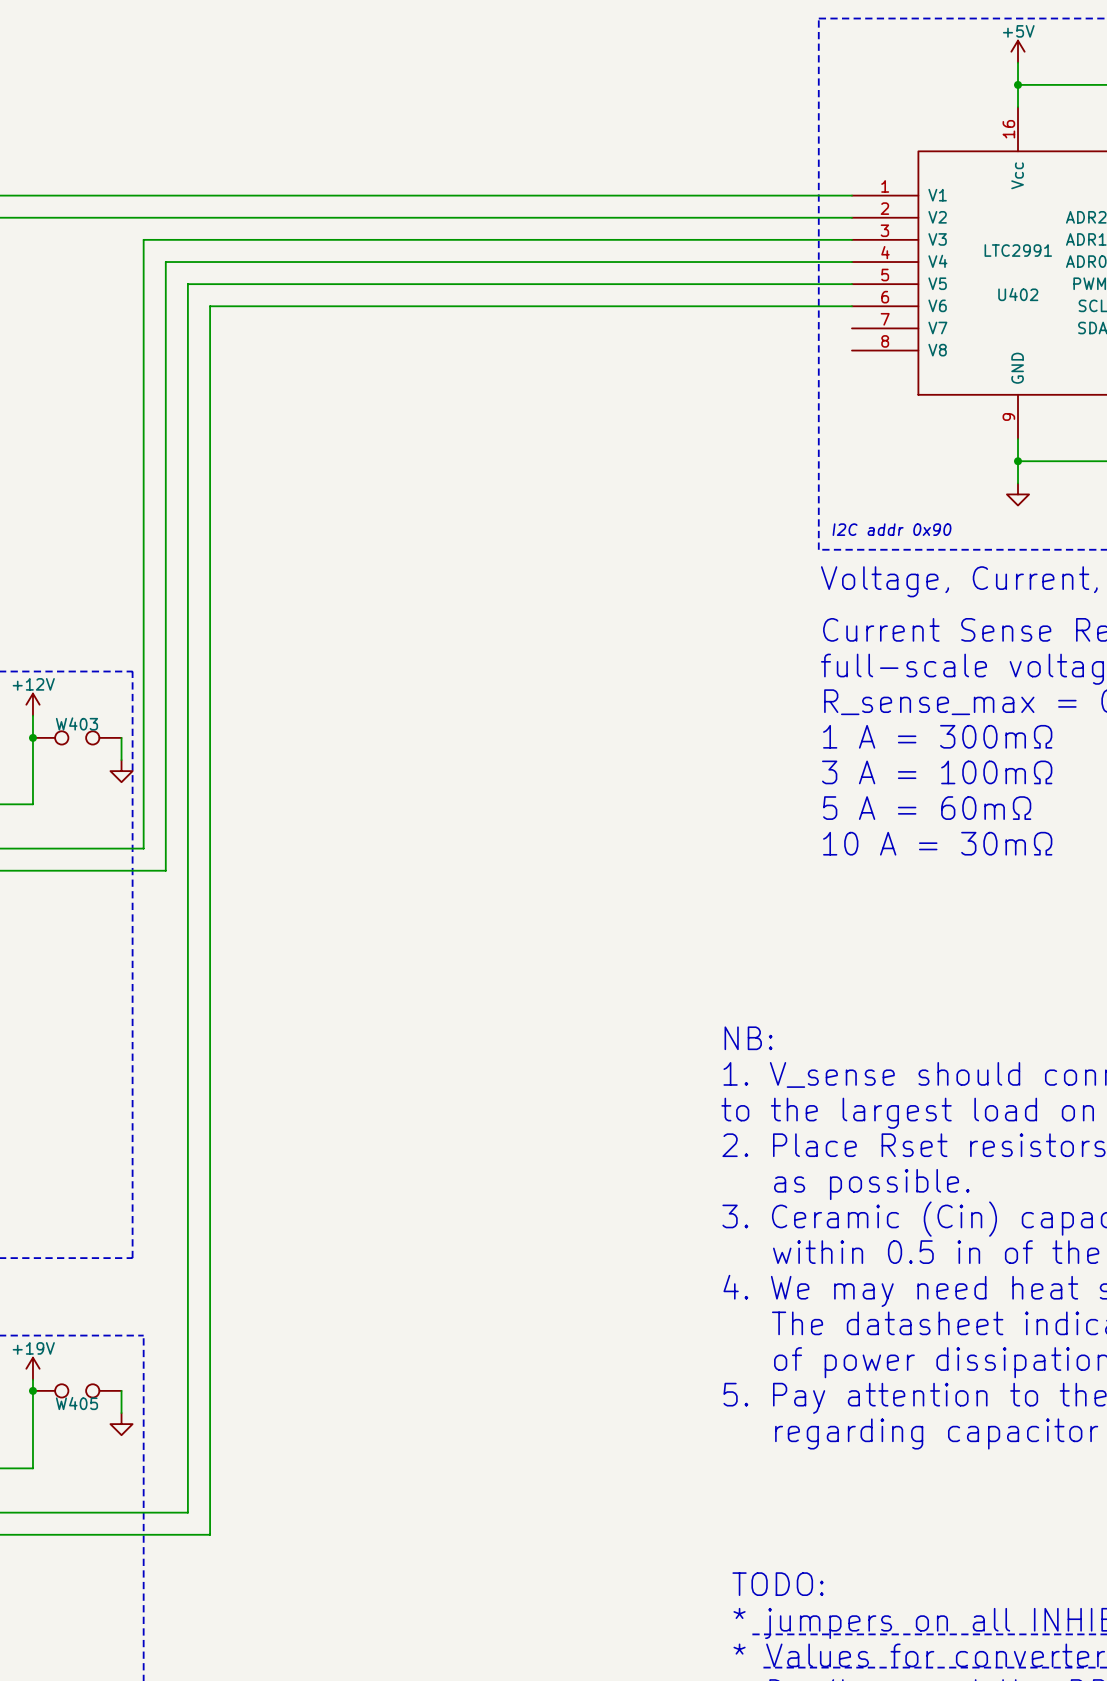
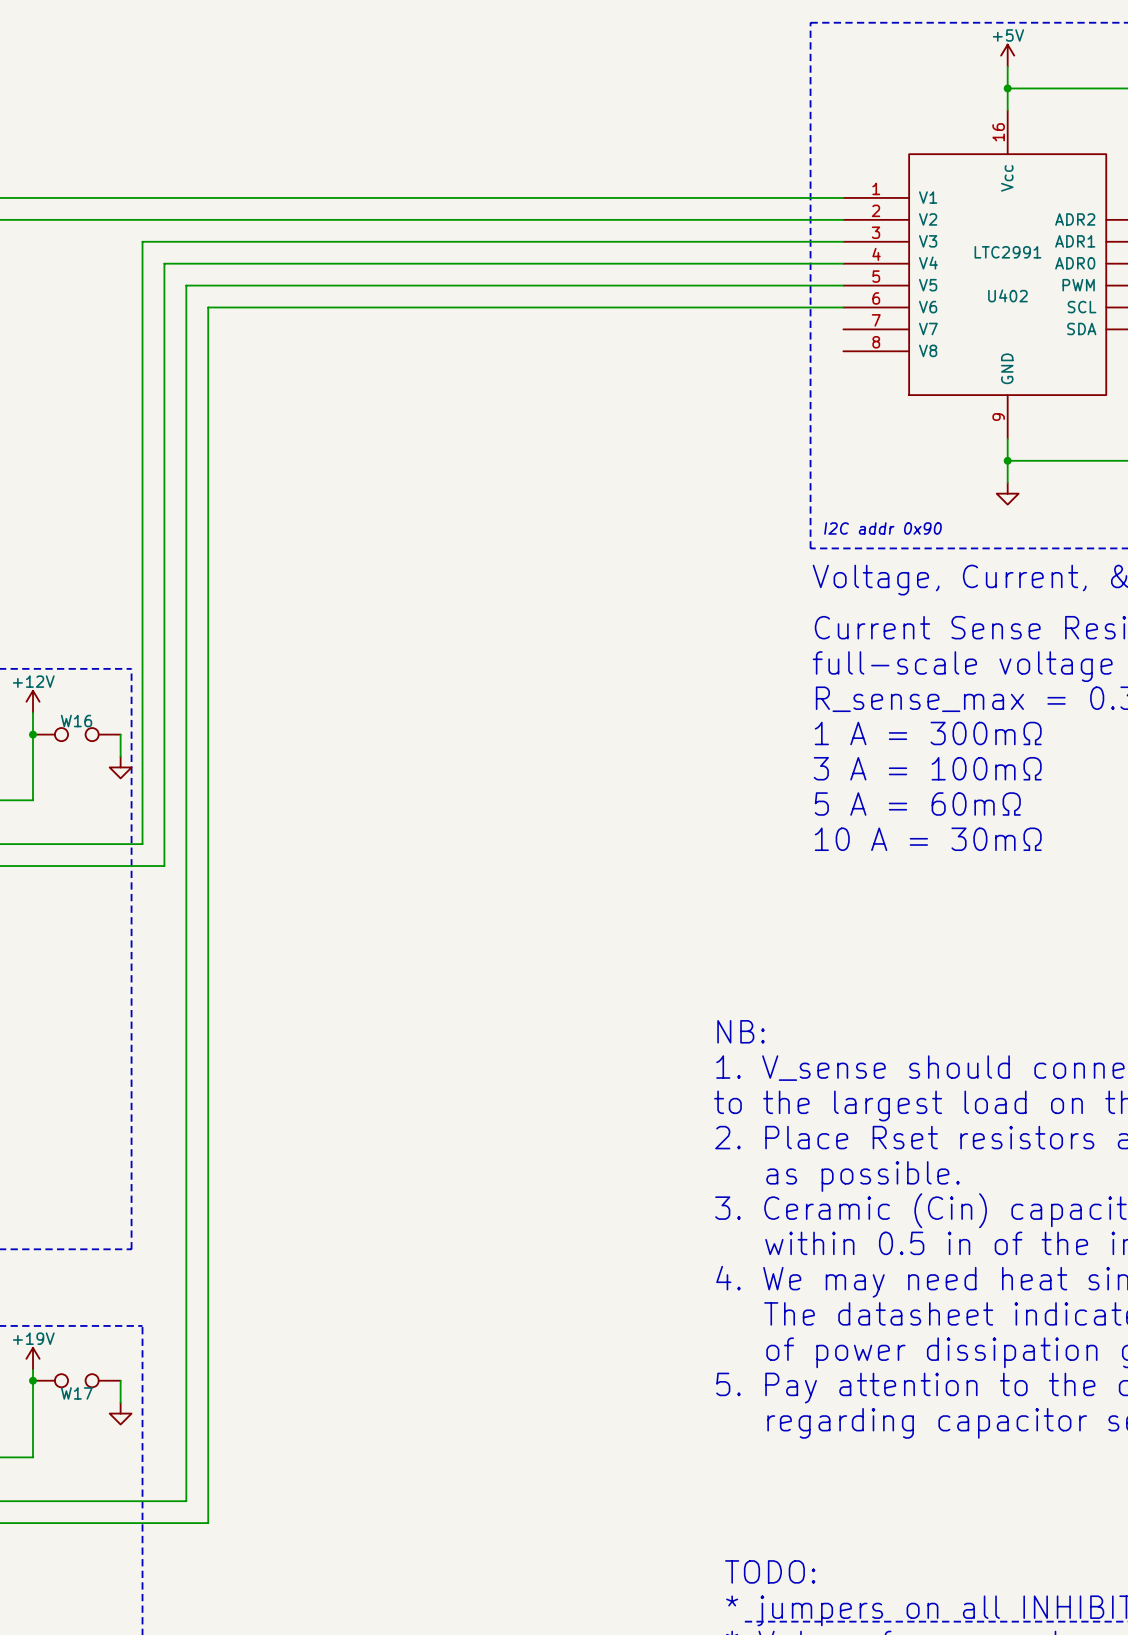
W403 name: W403 (76, 723) -> W16 (76, 721)
W405 name: W405 (76, 1403) -> W17 (76, 1393)

